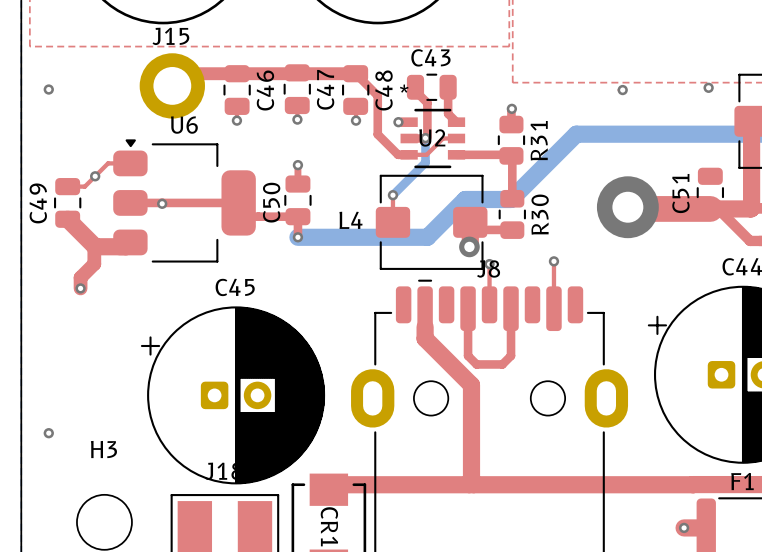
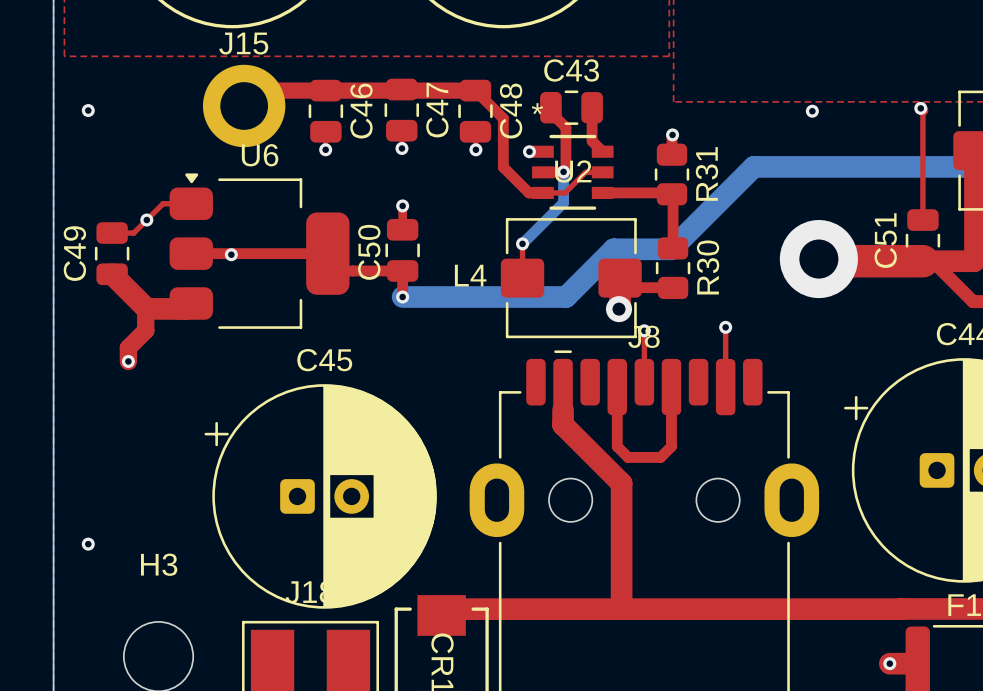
top track: none -> (920, 108) (922, 110) (922, 220)

